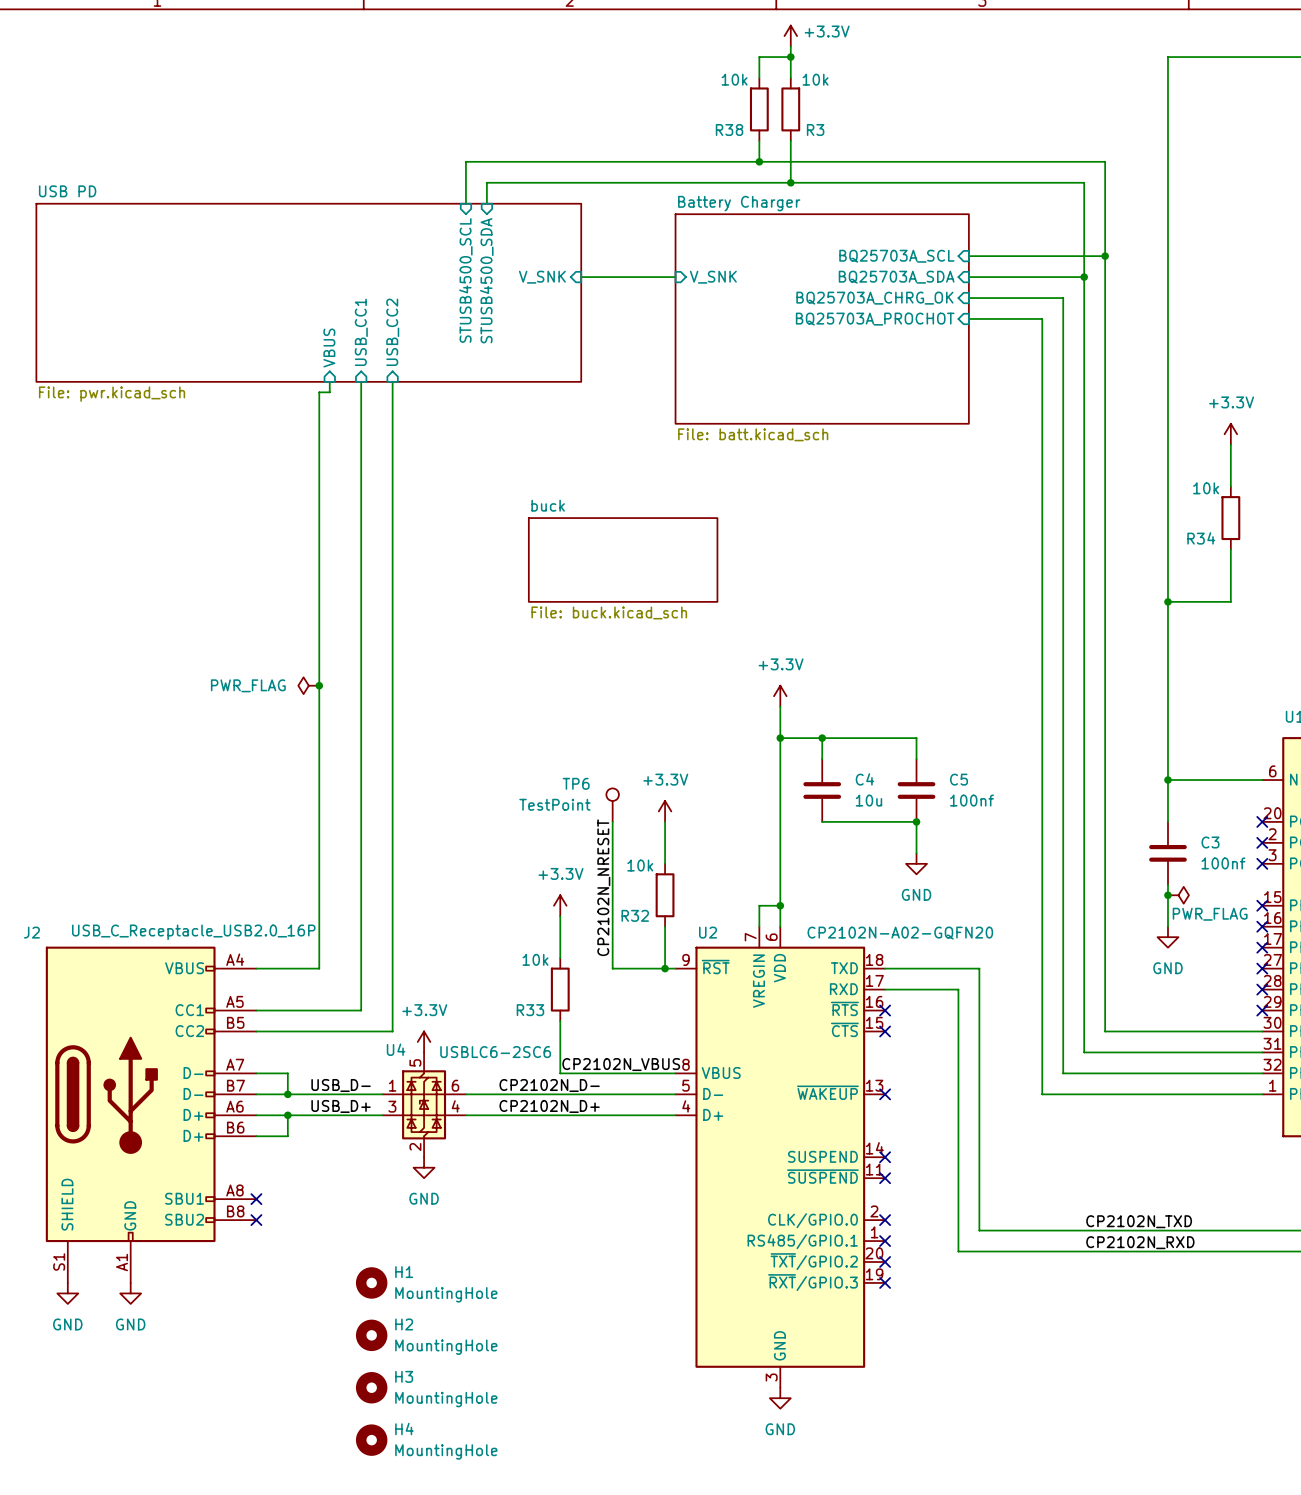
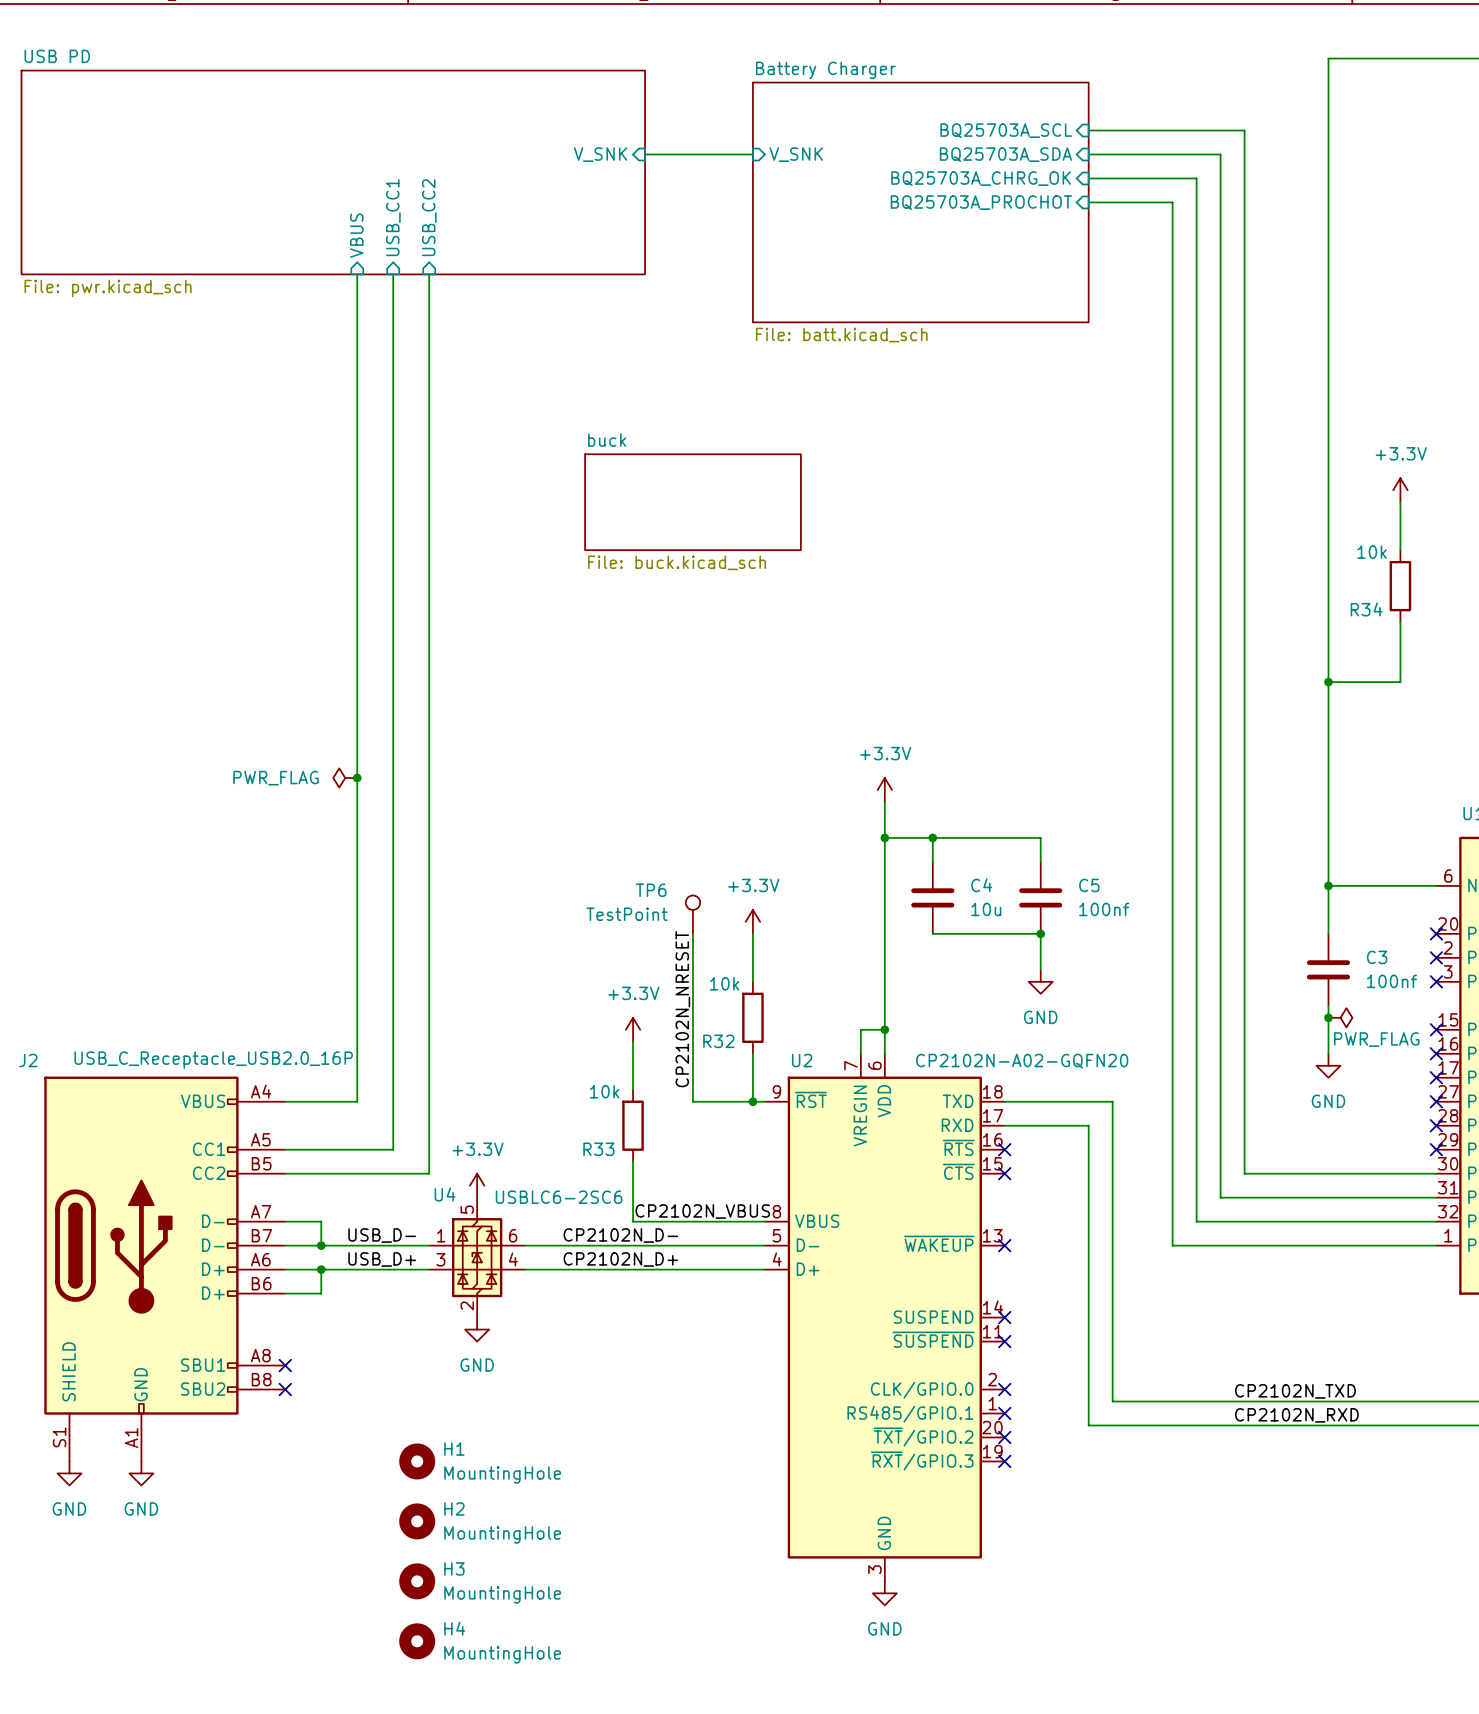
power symbol: +3.3V (790, 36) -> none
wire: (790, 46) (790, 78) -> none
wire: (790, 57) (759, 57) (759, 78) -> none
junction: (790, 57) -> none
R38: 10k (759, 109) -> none
R3: 10k (790, 109) -> none
wire: none -> (1088, 130) (1244, 130) (1244, 1173) (1256, 1173)
sheet pin: none -> V_SNK (600, 154)
sheet pin: none -> V_SNK (796, 154)
wire: (759, 140) (759, 161) -> none
wire: (790, 140) (790, 182) -> none
wire: none -> (1088, 154) (1220, 154) (1220, 1197) (1232, 1197)
junction: (759, 161) -> none
wire: (958, 161) (465, 161) (465, 203) -> none
wire: (1052, 161) (1105, 161) (1105, 1031) -> (1196, 178) (1196, 1221) (1208, 1221)
junction: (790, 182) -> none
wire: (958, 182) (486, 182) (486, 203) -> none
wire: (1031, 182) (1084, 182) (1084, 1052) -> (1172, 202) (1172, 1245) (1184, 1245)
sheet pin position: BQ25703A_SCL (896, 256) -> BQ25703A_SCL (1006, 130)
wire: (968, 256) (1105, 256) -> none
junction: (1105, 256) -> none
sheet pin: V_SNK (542, 277) -> none
wire: (581, 277) (675, 277) -> (645, 154) (752, 154)
sheet pin: V_SNK (713, 277) -> none
sheet pin position: BQ25703A_SDA (896, 277) -> BQ25703A_SDA (1005, 154)
wire: (968, 277) (1084, 277) -> none
junction: (1084, 277) -> none
sheet pin: STUSB4500_SCL (465, 280) -> none
sheet pin: STUSB4500_SDA (486, 280) -> none
sheet USB PD position: (308, 292) -> (333, 172)
sheet pin position: BQ25703A_CHRG_OK (874, 298) -> BQ25703A_CHRG_OK (981, 178)
wire: (968, 298) (1063, 298) (1063, 1073) -> none
sheet Battery Charger position: (822, 318) -> (920, 202)
wire: (968, 318) (1042, 318) (1042, 1094) -> none
sheet pin position: BQ25703A_PROCHOT (875, 319) -> BQ25703A_PROCHOT (981, 202)
sheet pin position: USB_CC1 (361, 332) -> USB_CC1 (393, 217)
sheet pin position: USB_CC2 (392, 332) -> USB_CC2 (429, 217)
sheet pin position: VBUS (329, 348) -> VBUS (356, 235)
wire: (329, 381) (329, 392) (319, 392) -> (357, 274) (357, 442)
wire: (361, 381) (361, 1010) (350, 1010) -> (393, 274) (393, 1149)
wire: (392, 381) (392, 1031) (382, 1031) -> (429, 274) (429, 1173)
sheet buck position: (623, 559) -> (692, 502)

